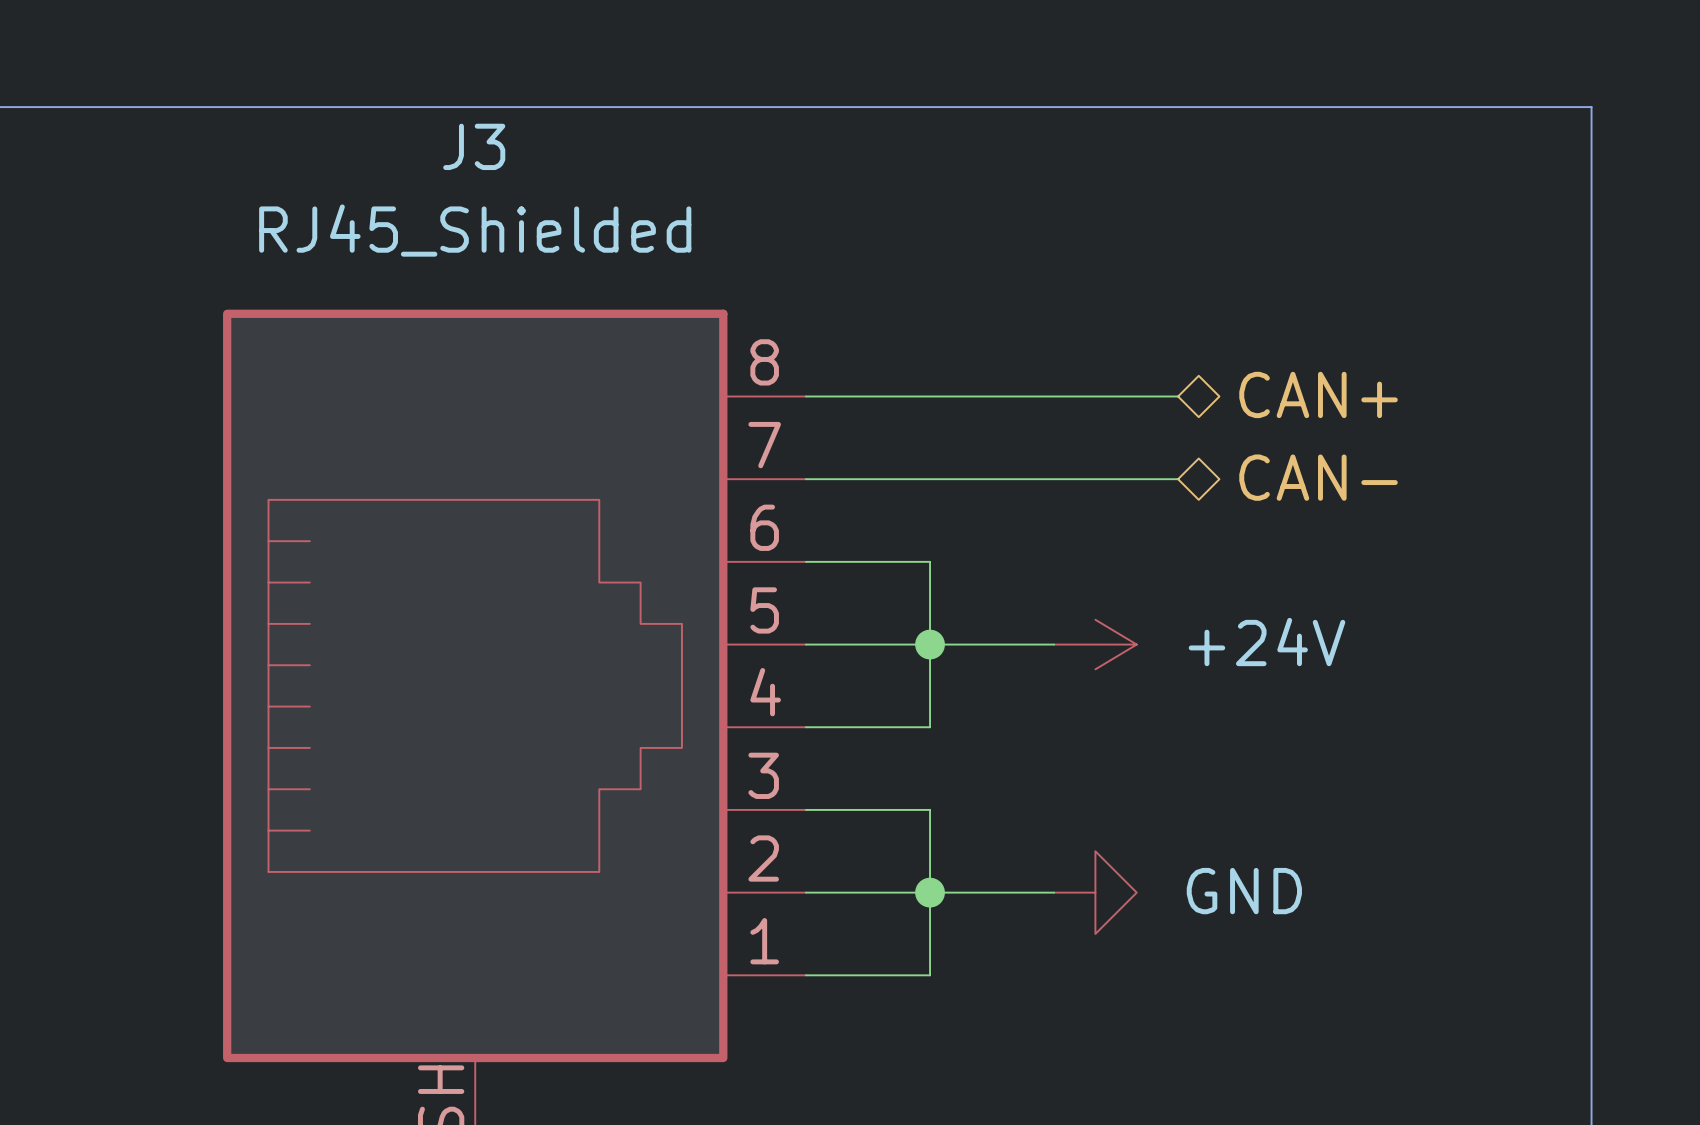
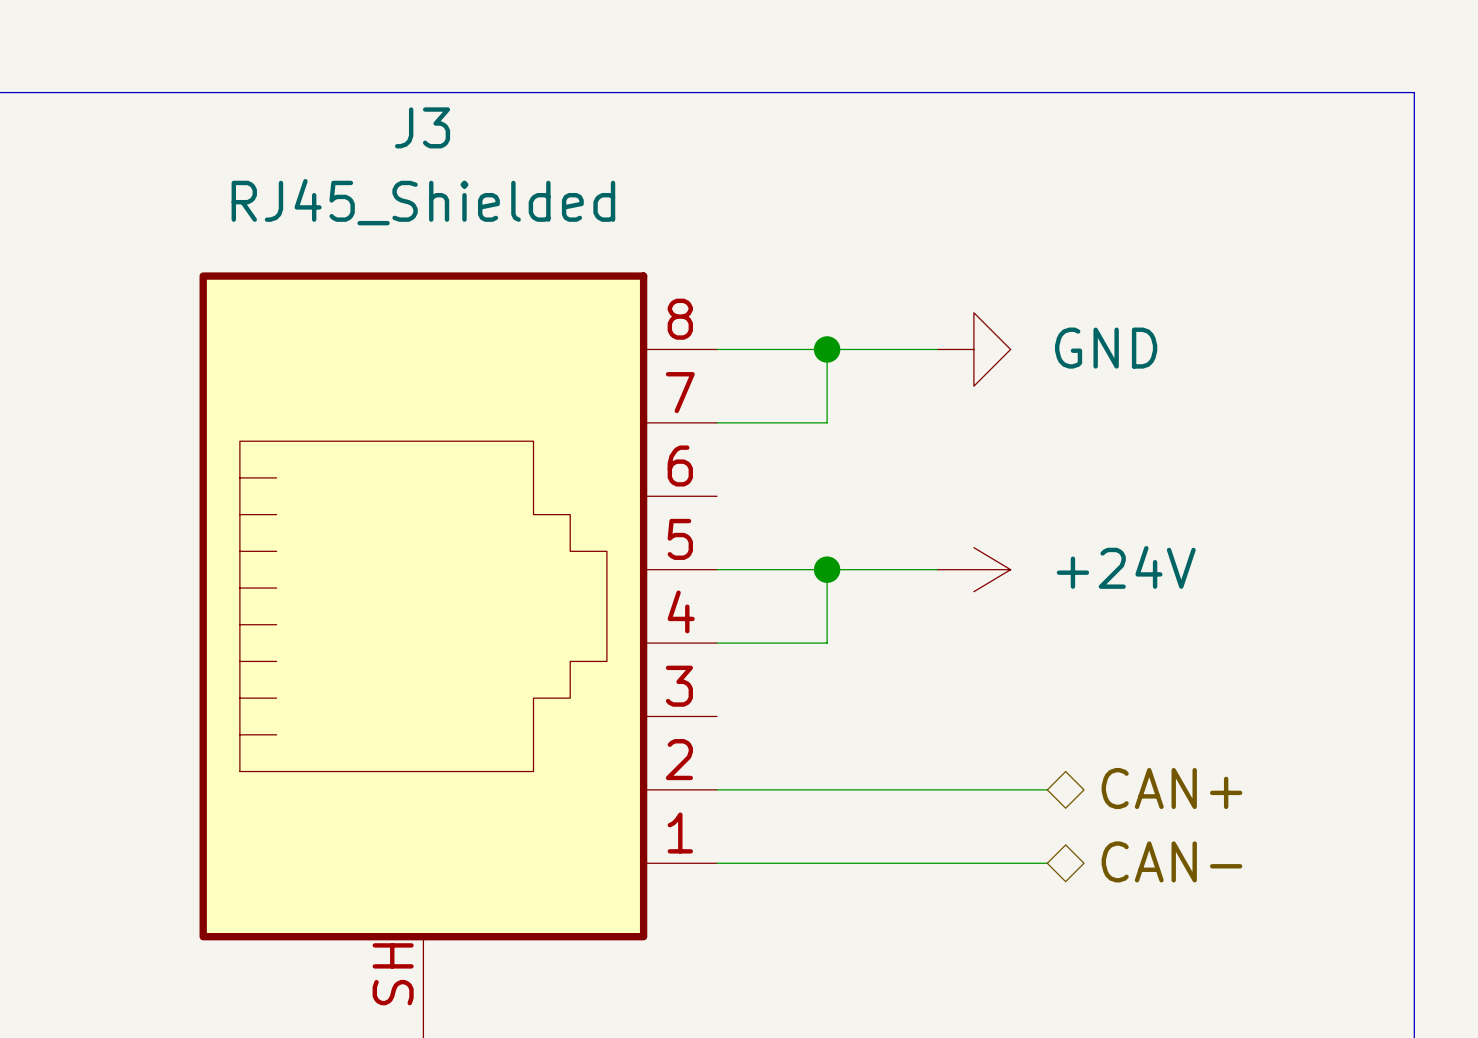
hierarchical label position: CAN+ (1318, 394) -> CAN+ (1171, 788)
junction: none -> (827, 349)
wire: (1054, 396) (1178, 396) -> (937, 789) (1047, 789)
hierarchical label position: CAN- (1318, 477) -> CAN- (1171, 861)
wire: (930, 479) (1178, 479) -> (827, 422) (827, 349)
wire: (805, 561) (930, 561) (930, 644) -> none
wire: (805, 809) (930, 809) (930, 975) -> (1047, 863) (827, 863)
junction: (930, 892) -> none
power symbol position: GND (1095, 892) -> GND (973, 349)

